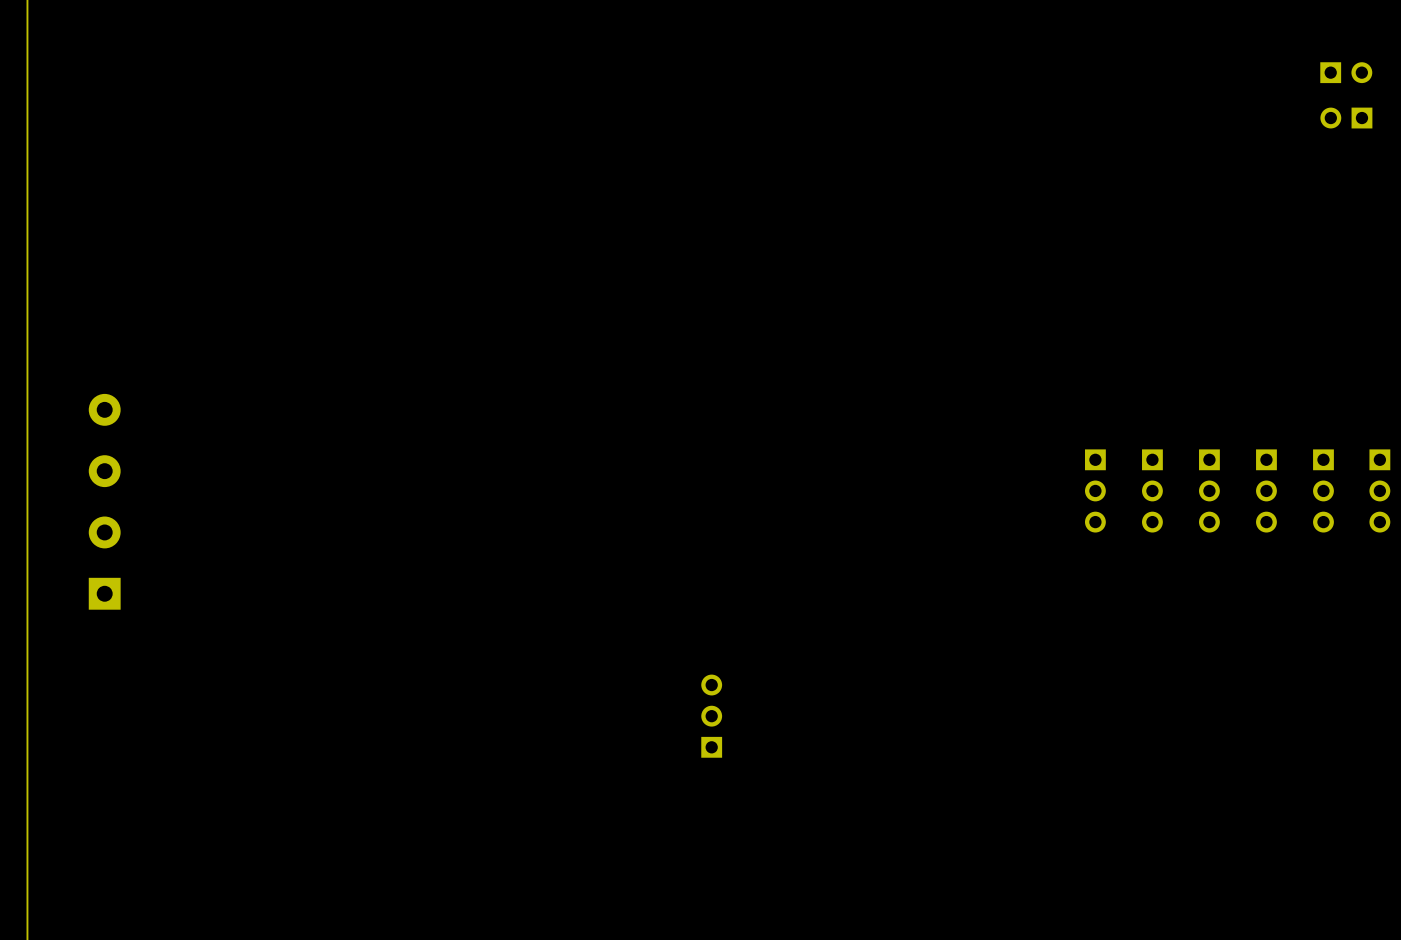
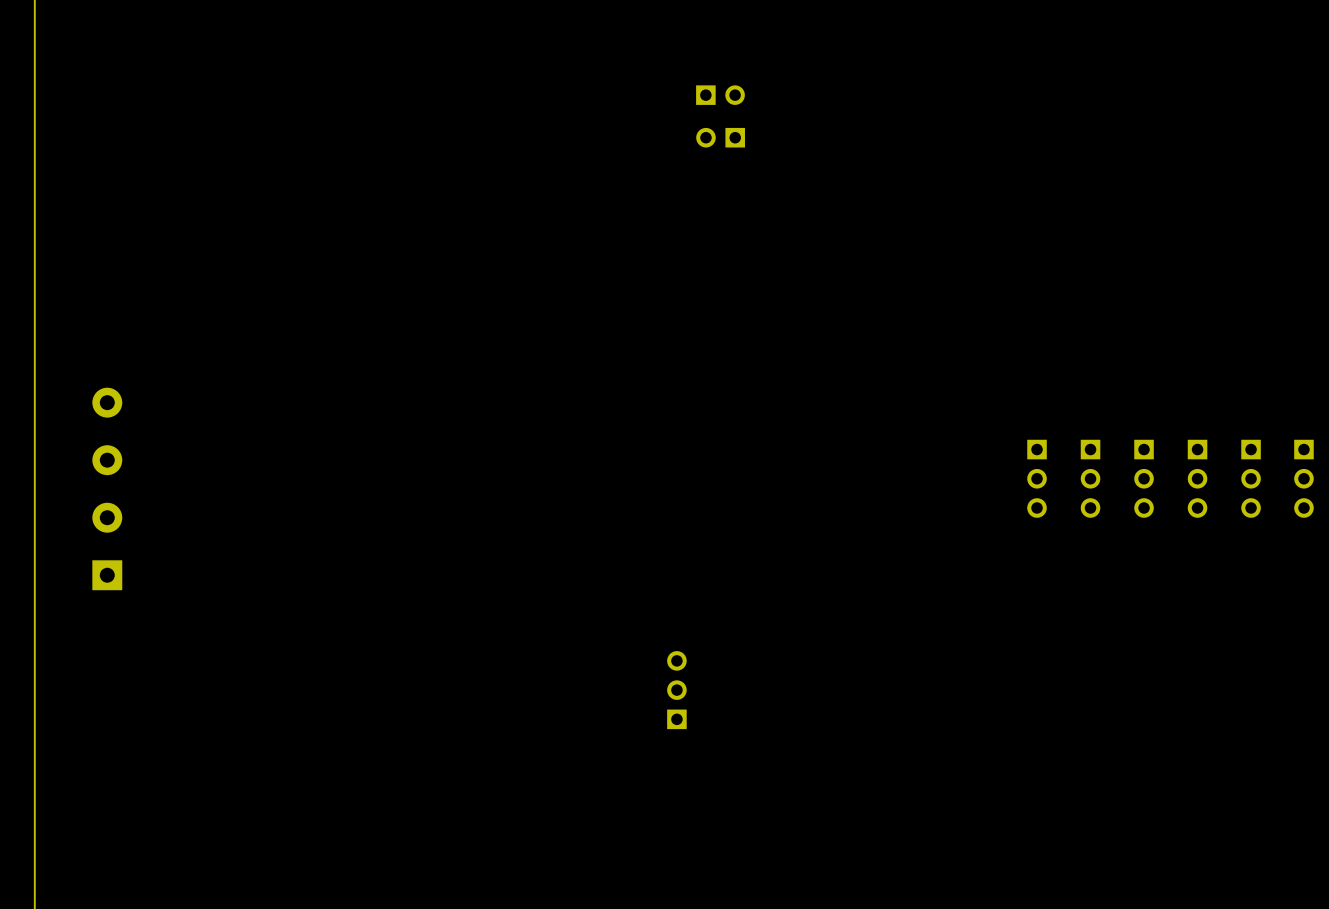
part: (1346, 72) -> none
part: none -> (720, 95)
part: (1346, 118) -> none
part: none -> (720, 137)

